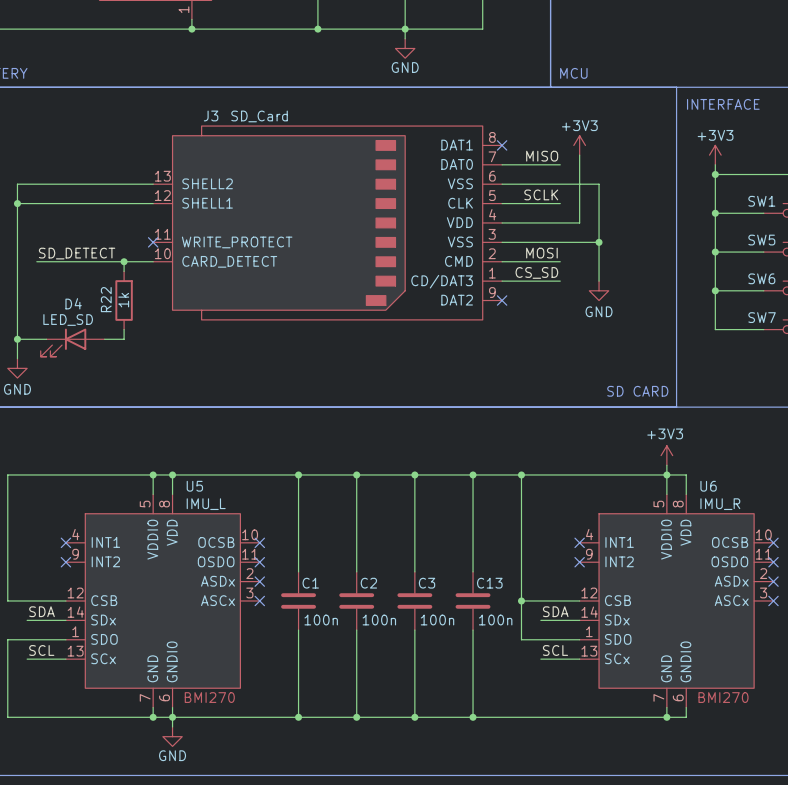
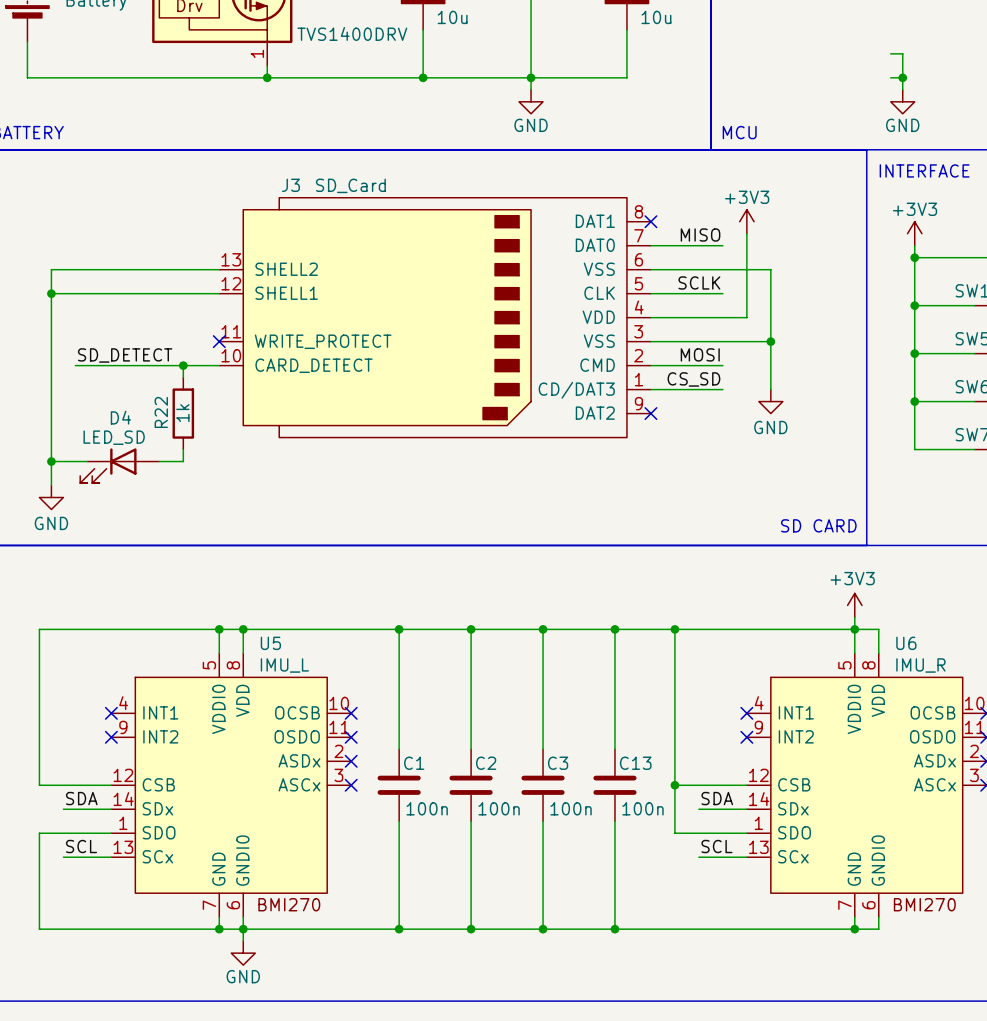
wire: none -> (890, 53) (902, 53) (902, 89)
wire: none -> (890, 77) (902, 77)
junction: none -> (902, 77)
power symbol: none -> GND (902, 101)

